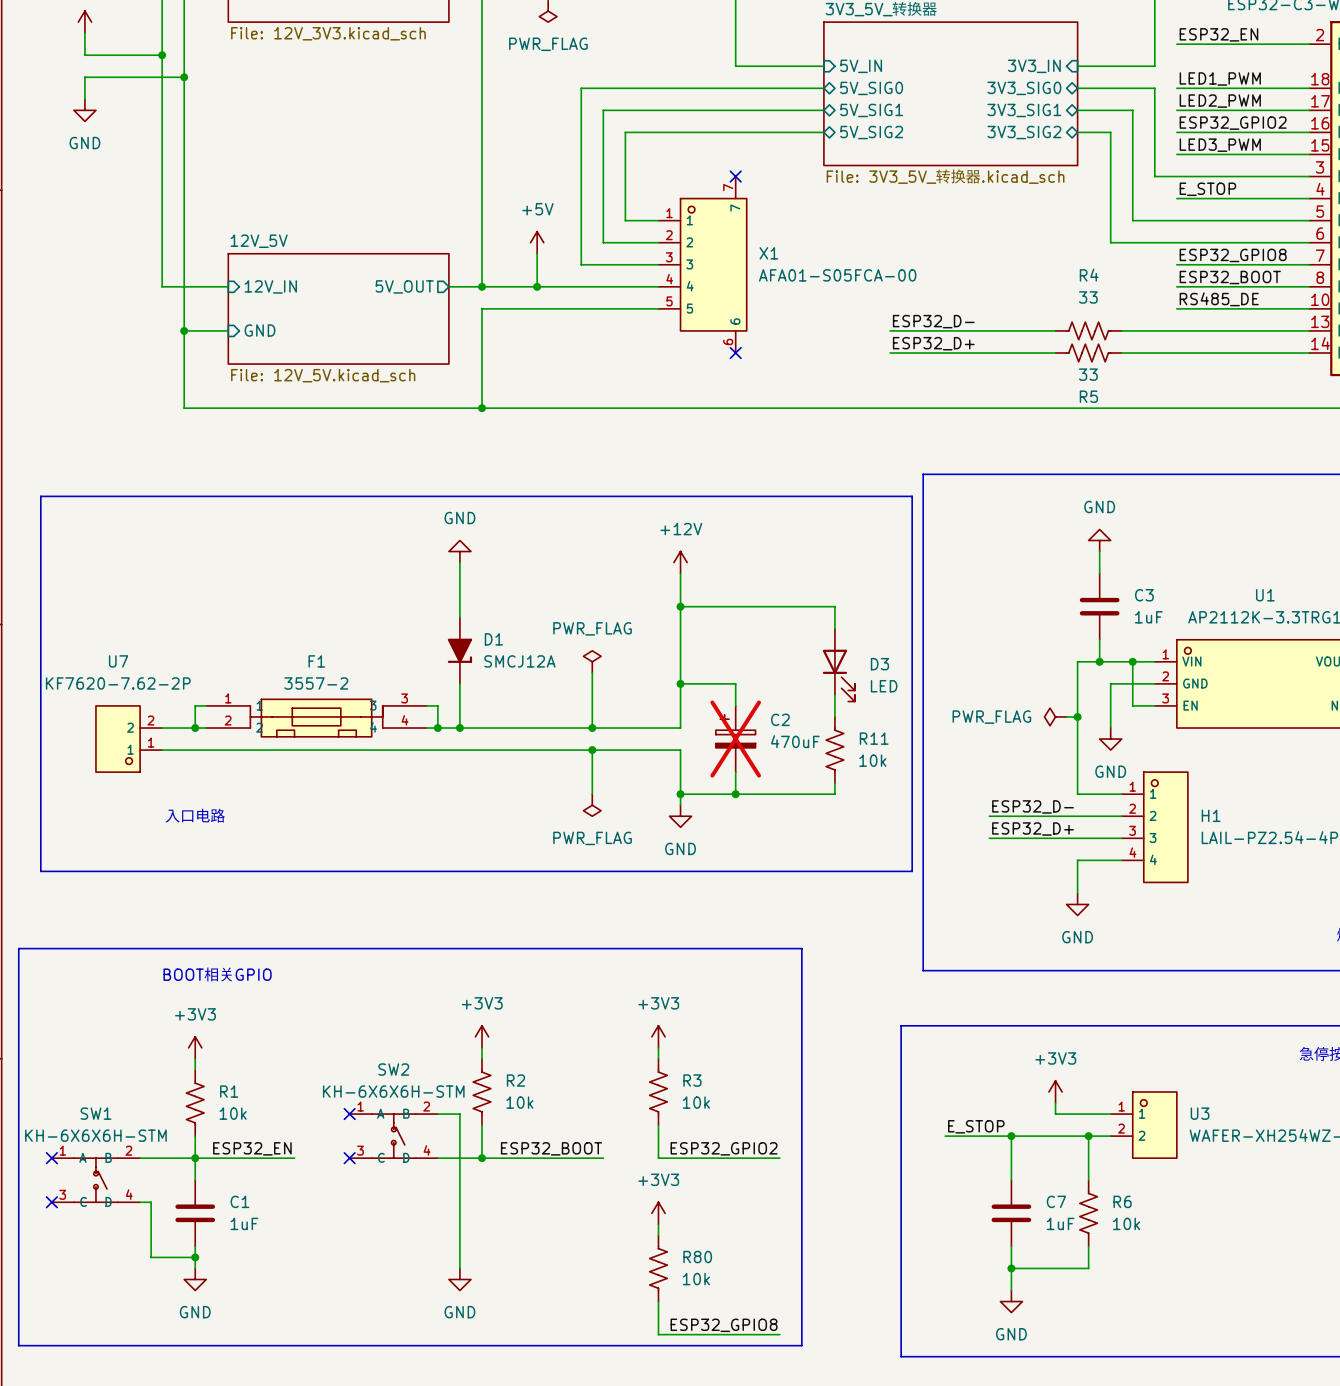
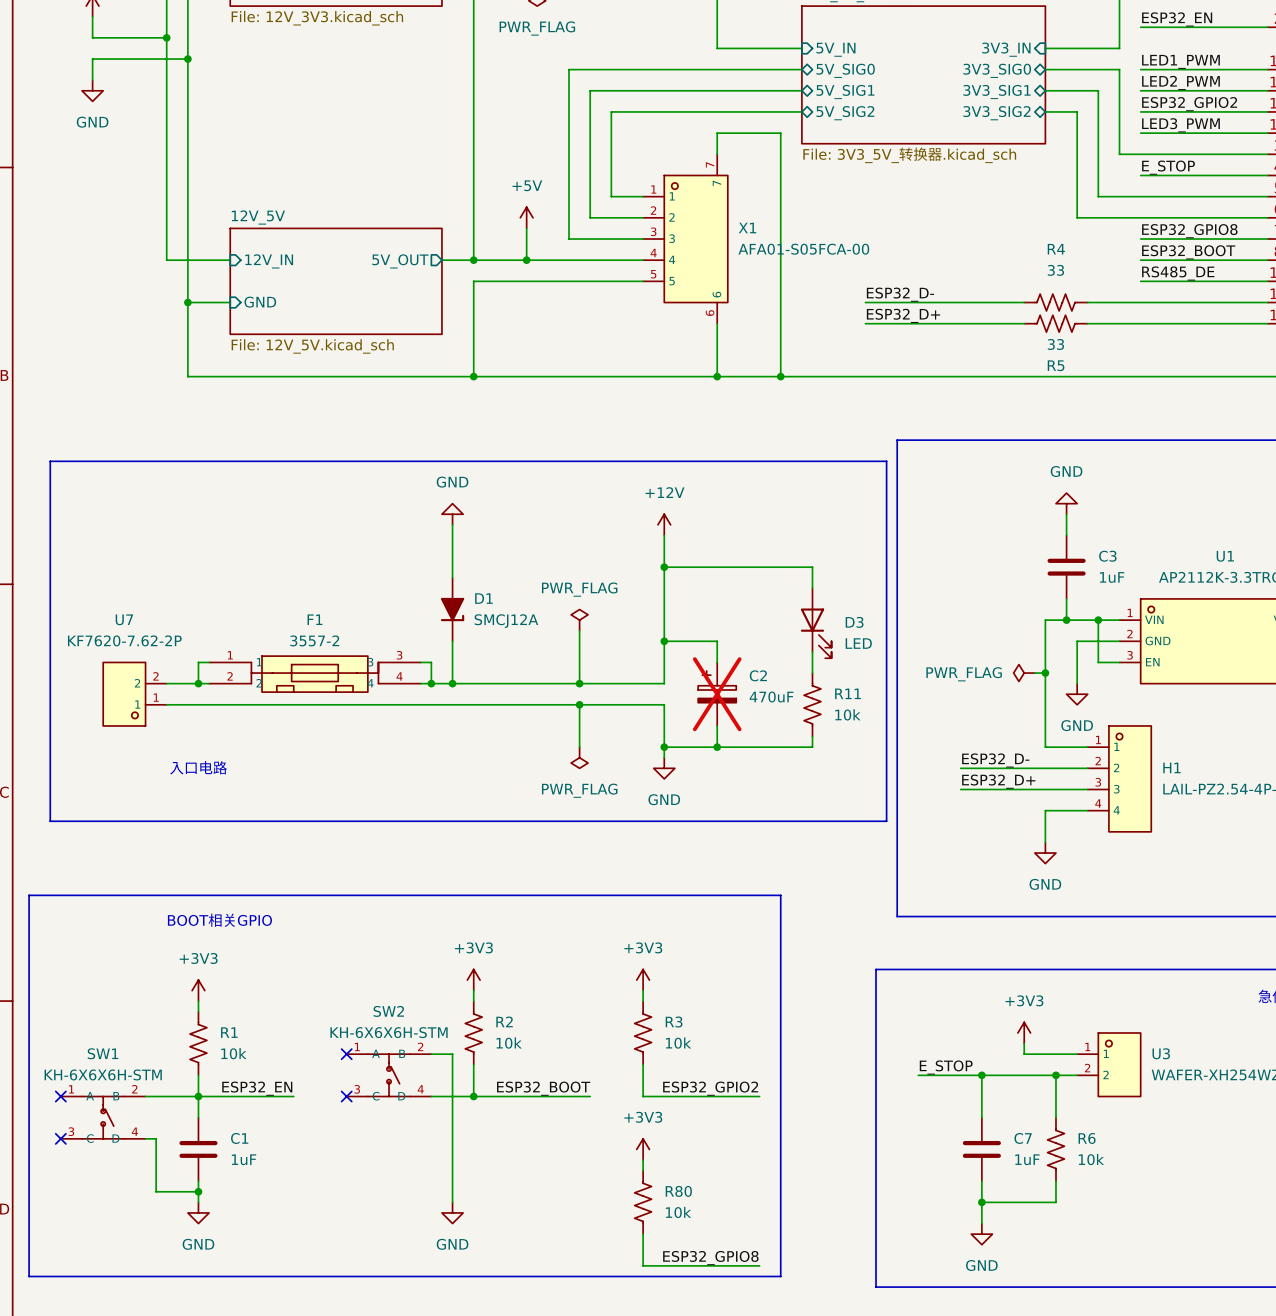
wire: none -> (717, 154) (717, 133) (780, 133) (780, 376)
no-connect mark: (735, 176) -> none
wire: none -> (717, 323) (717, 376)
no-connect mark: (735, 353) -> none
junction: none -> (717, 376)
junction: none -> (780, 376)

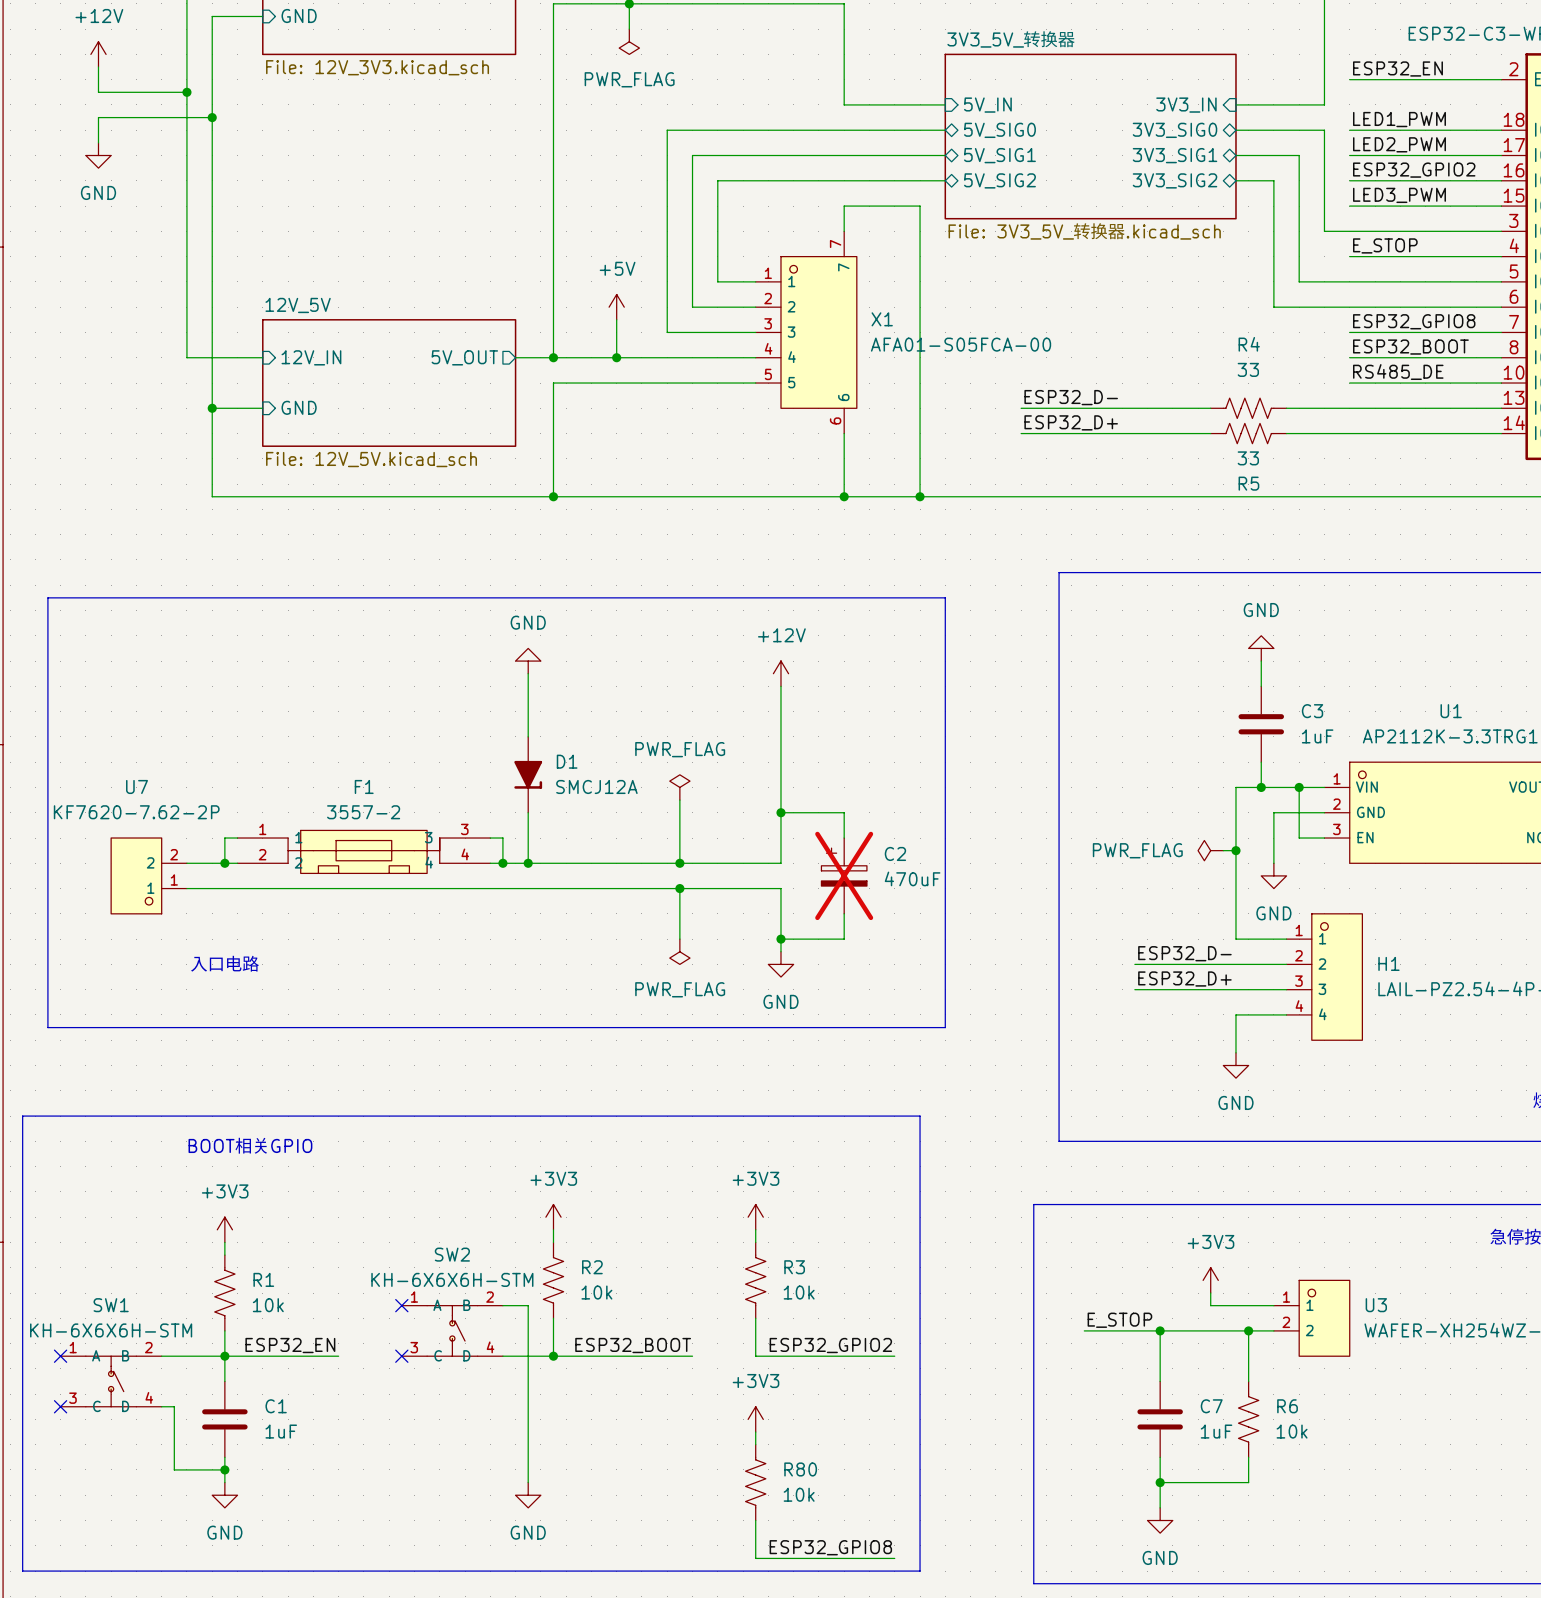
line: (801, 461) (886, 461) (886, 821) (801, 821) -> (945, 597) (945, 1027)
wire: (664, 567) (812, 567) (812, 588) -> none
junction: (664, 567) -> none
D3: LED (816, 623) -> none
wire: (812, 651) (812, 673) -> none
R11: 10k (812, 704) -> none
wire: (812, 736) (812, 747) (717, 747) -> none
junction: (717, 747) -> none

